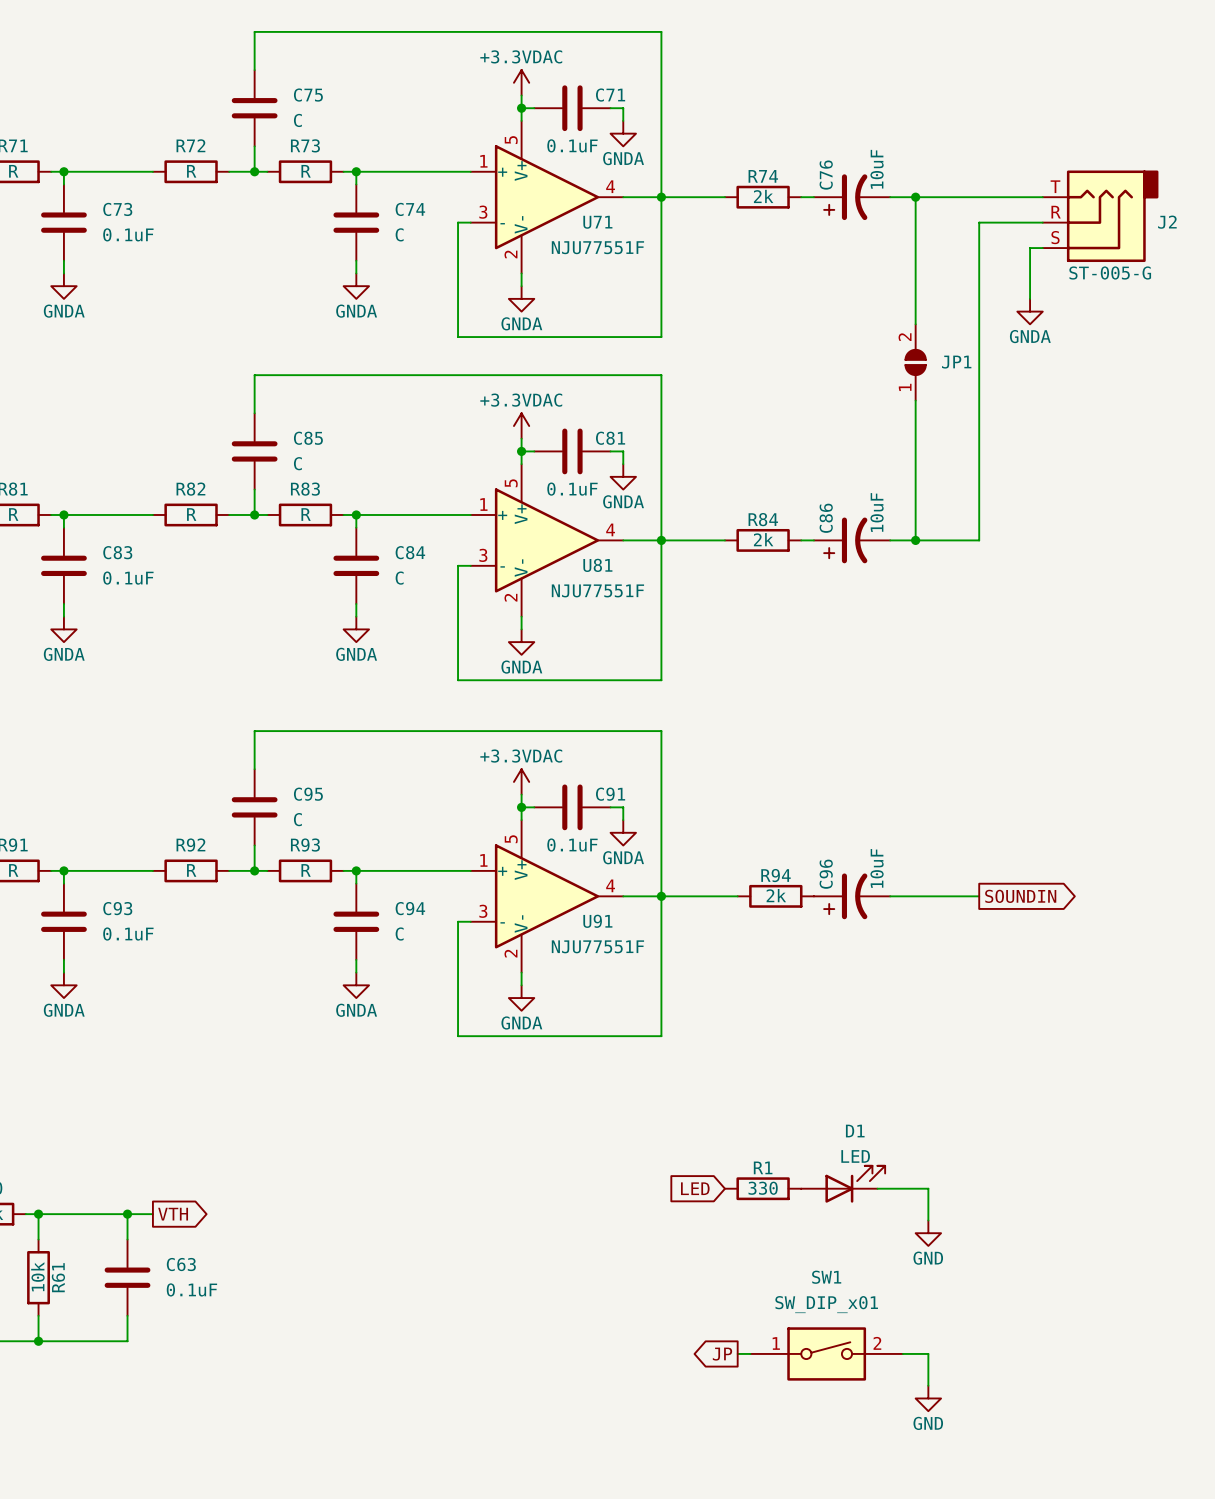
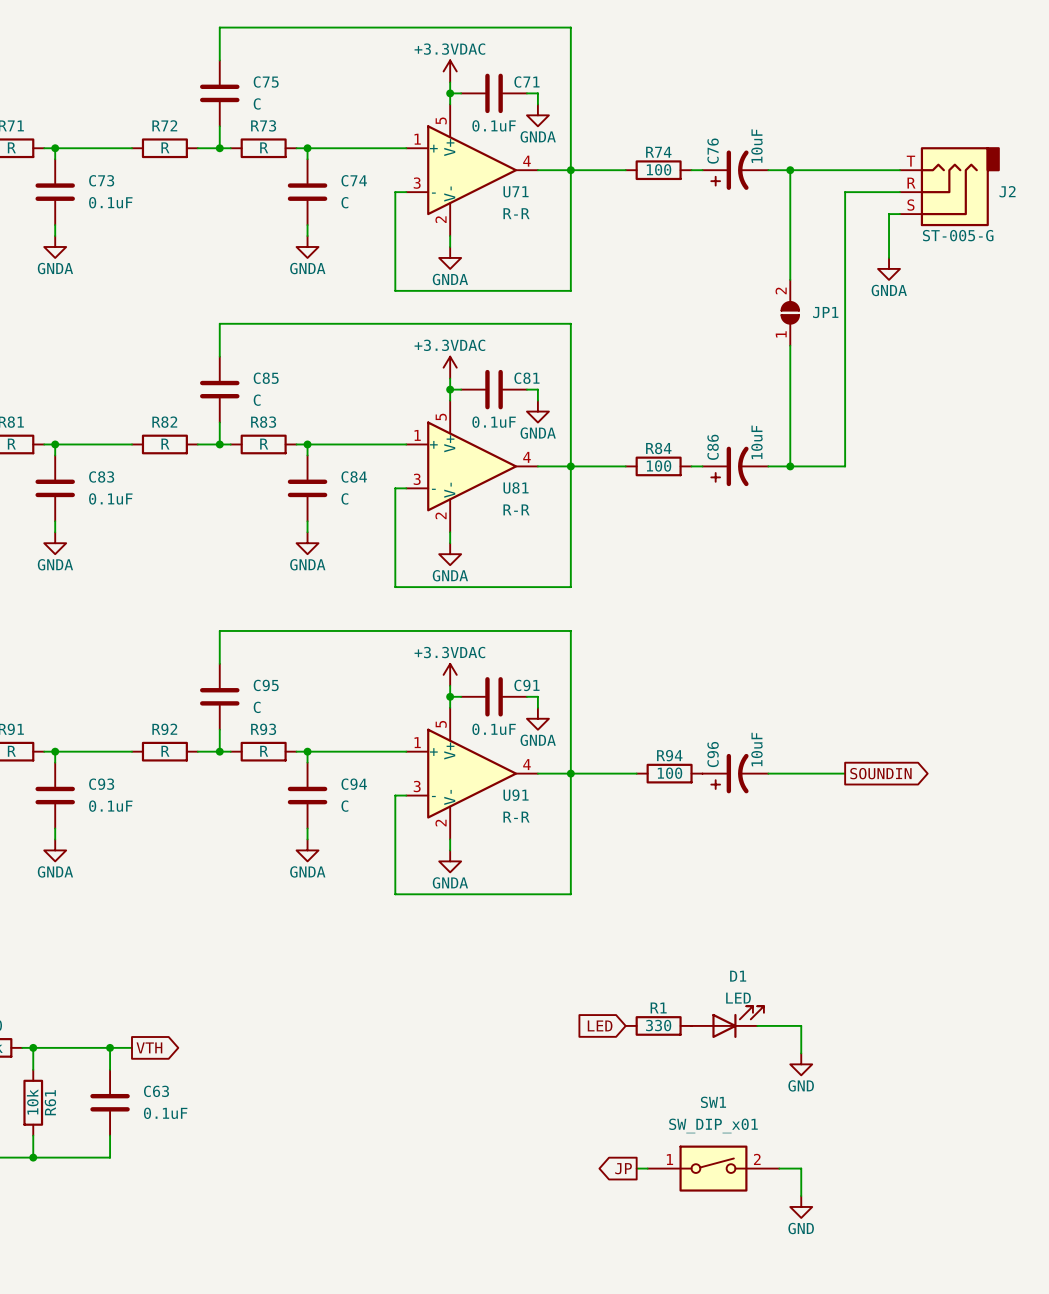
R74 value: 2k (763, 196) -> 100 (659, 169)
U71 value: NJU77551F (597, 247) -> R-R (516, 213)
R84 value: 2k (763, 539) -> 100 (659, 466)
U81 value: NJU77551F (597, 590) -> R-R (516, 509)
R94 value: 2k (776, 895) -> 100 (670, 773)
U91 value: NJU77551F (597, 946) -> R-R (516, 817)

